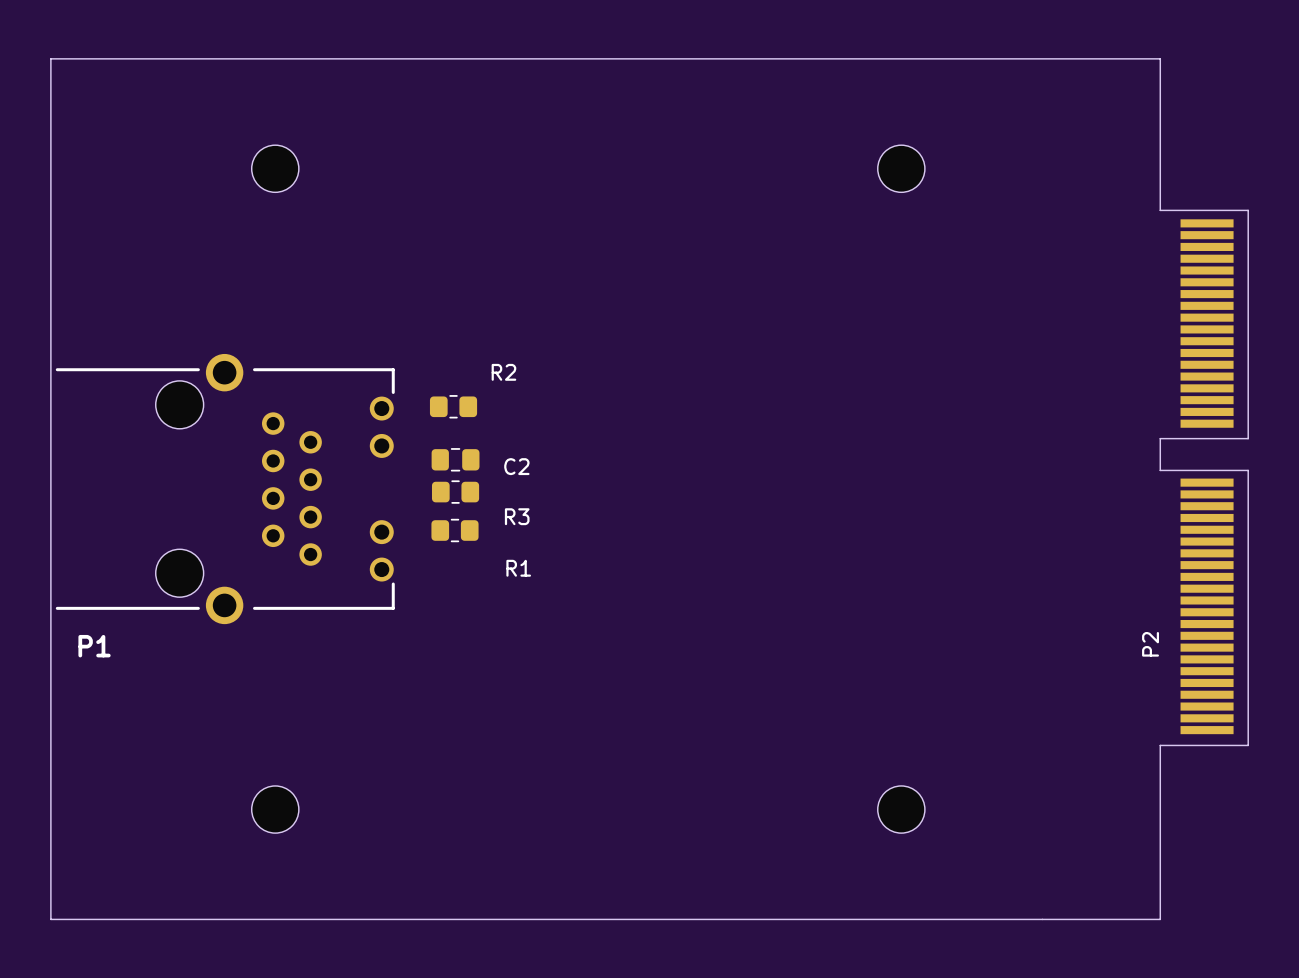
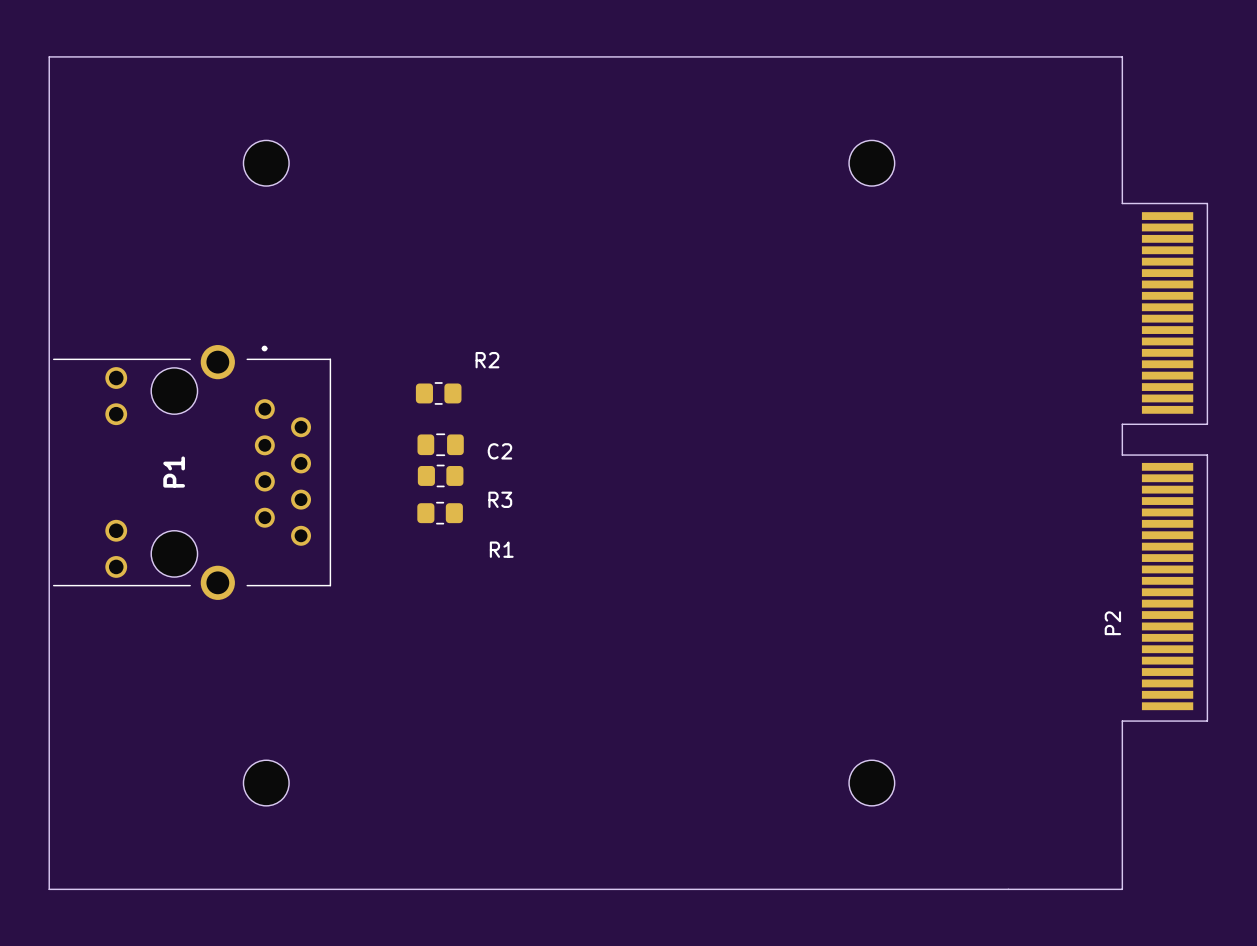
P1 footprint: [55, 353, 395, 625] -> [52, 345, 332, 600]
P1 name position: P1 (94, 646) -> P1 (174, 472)

